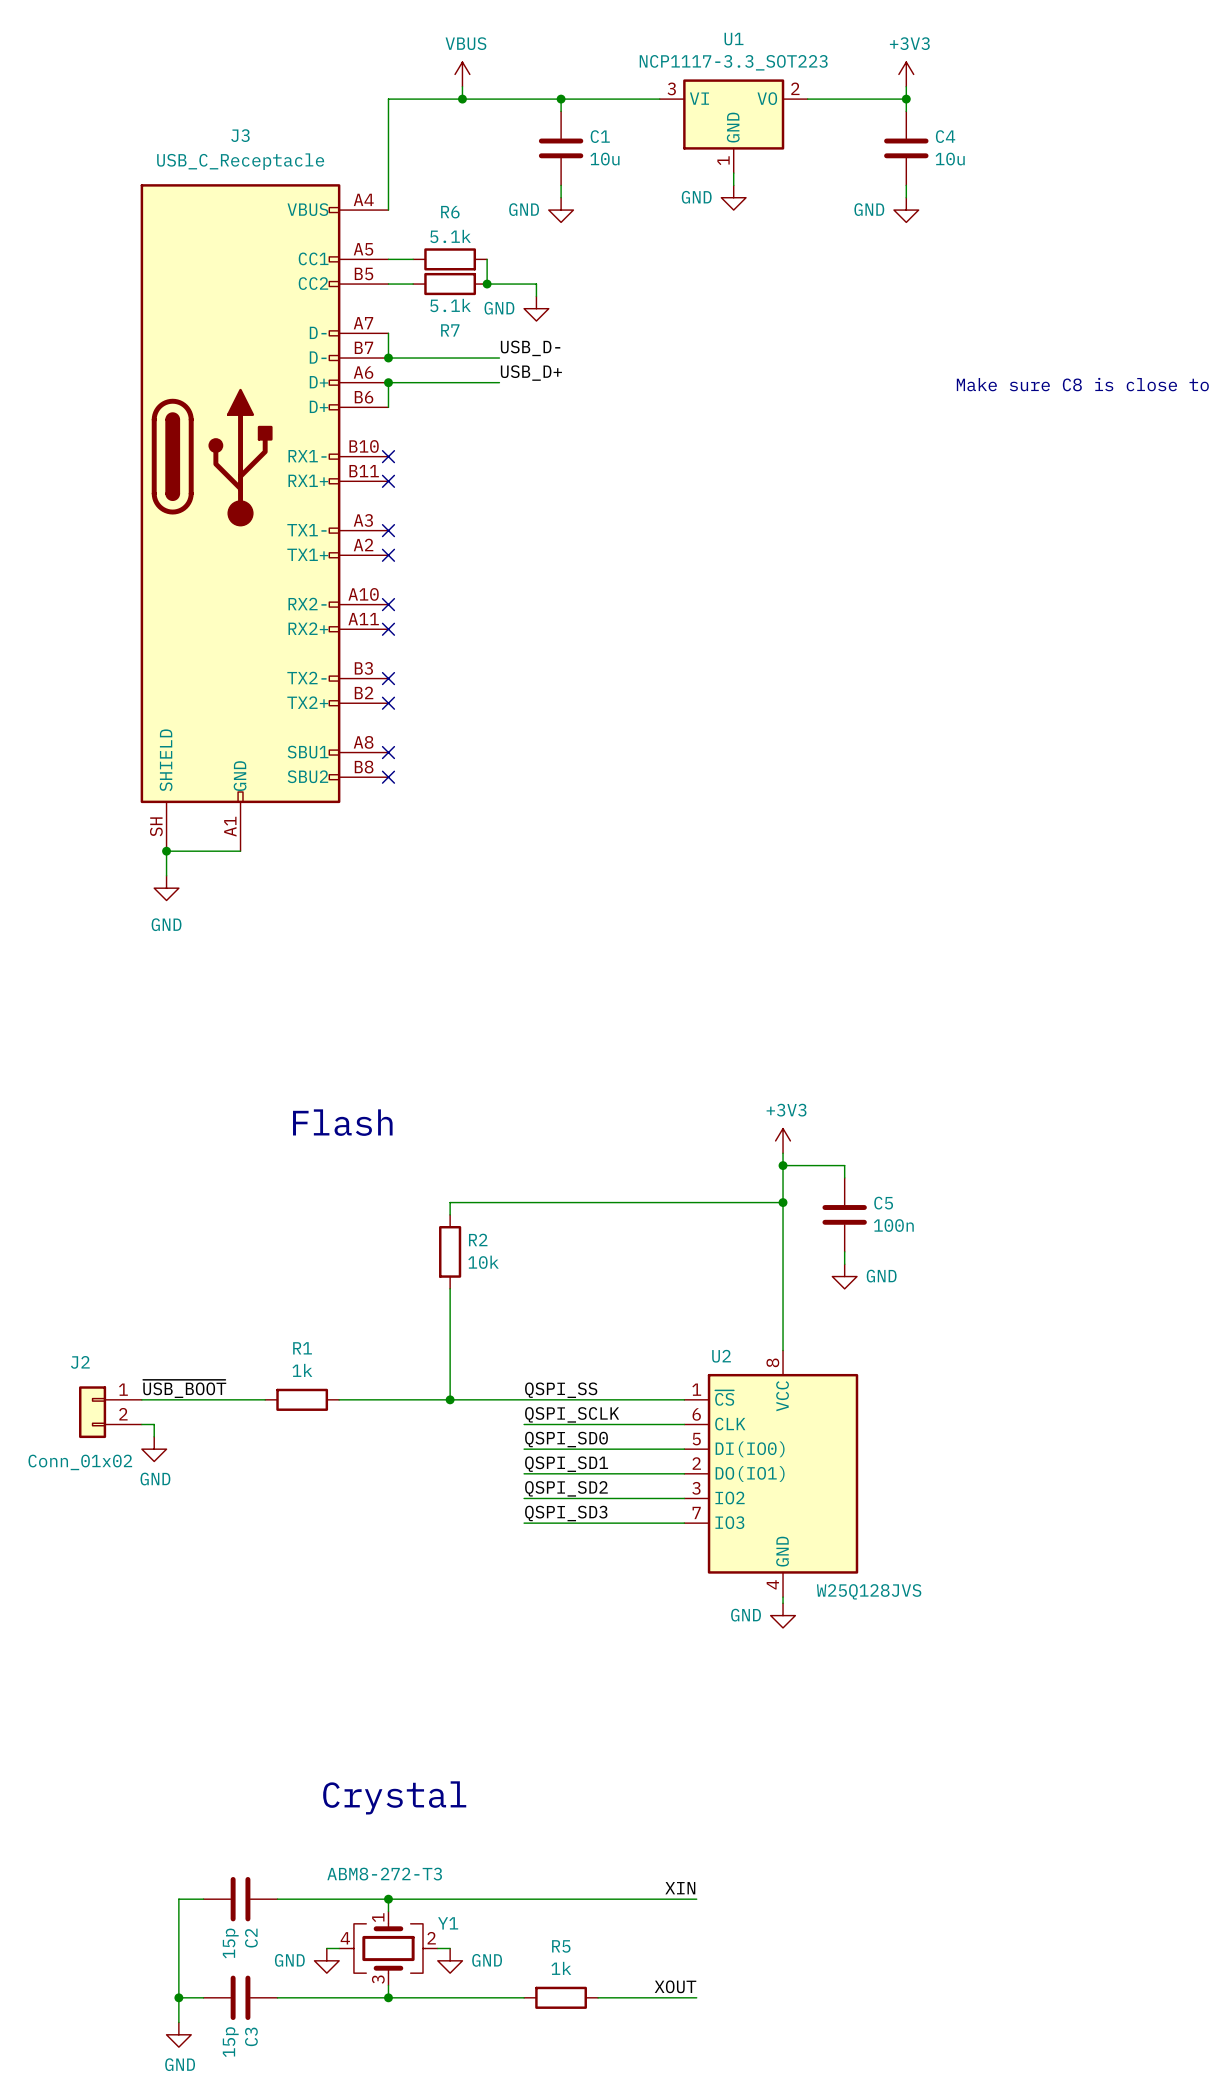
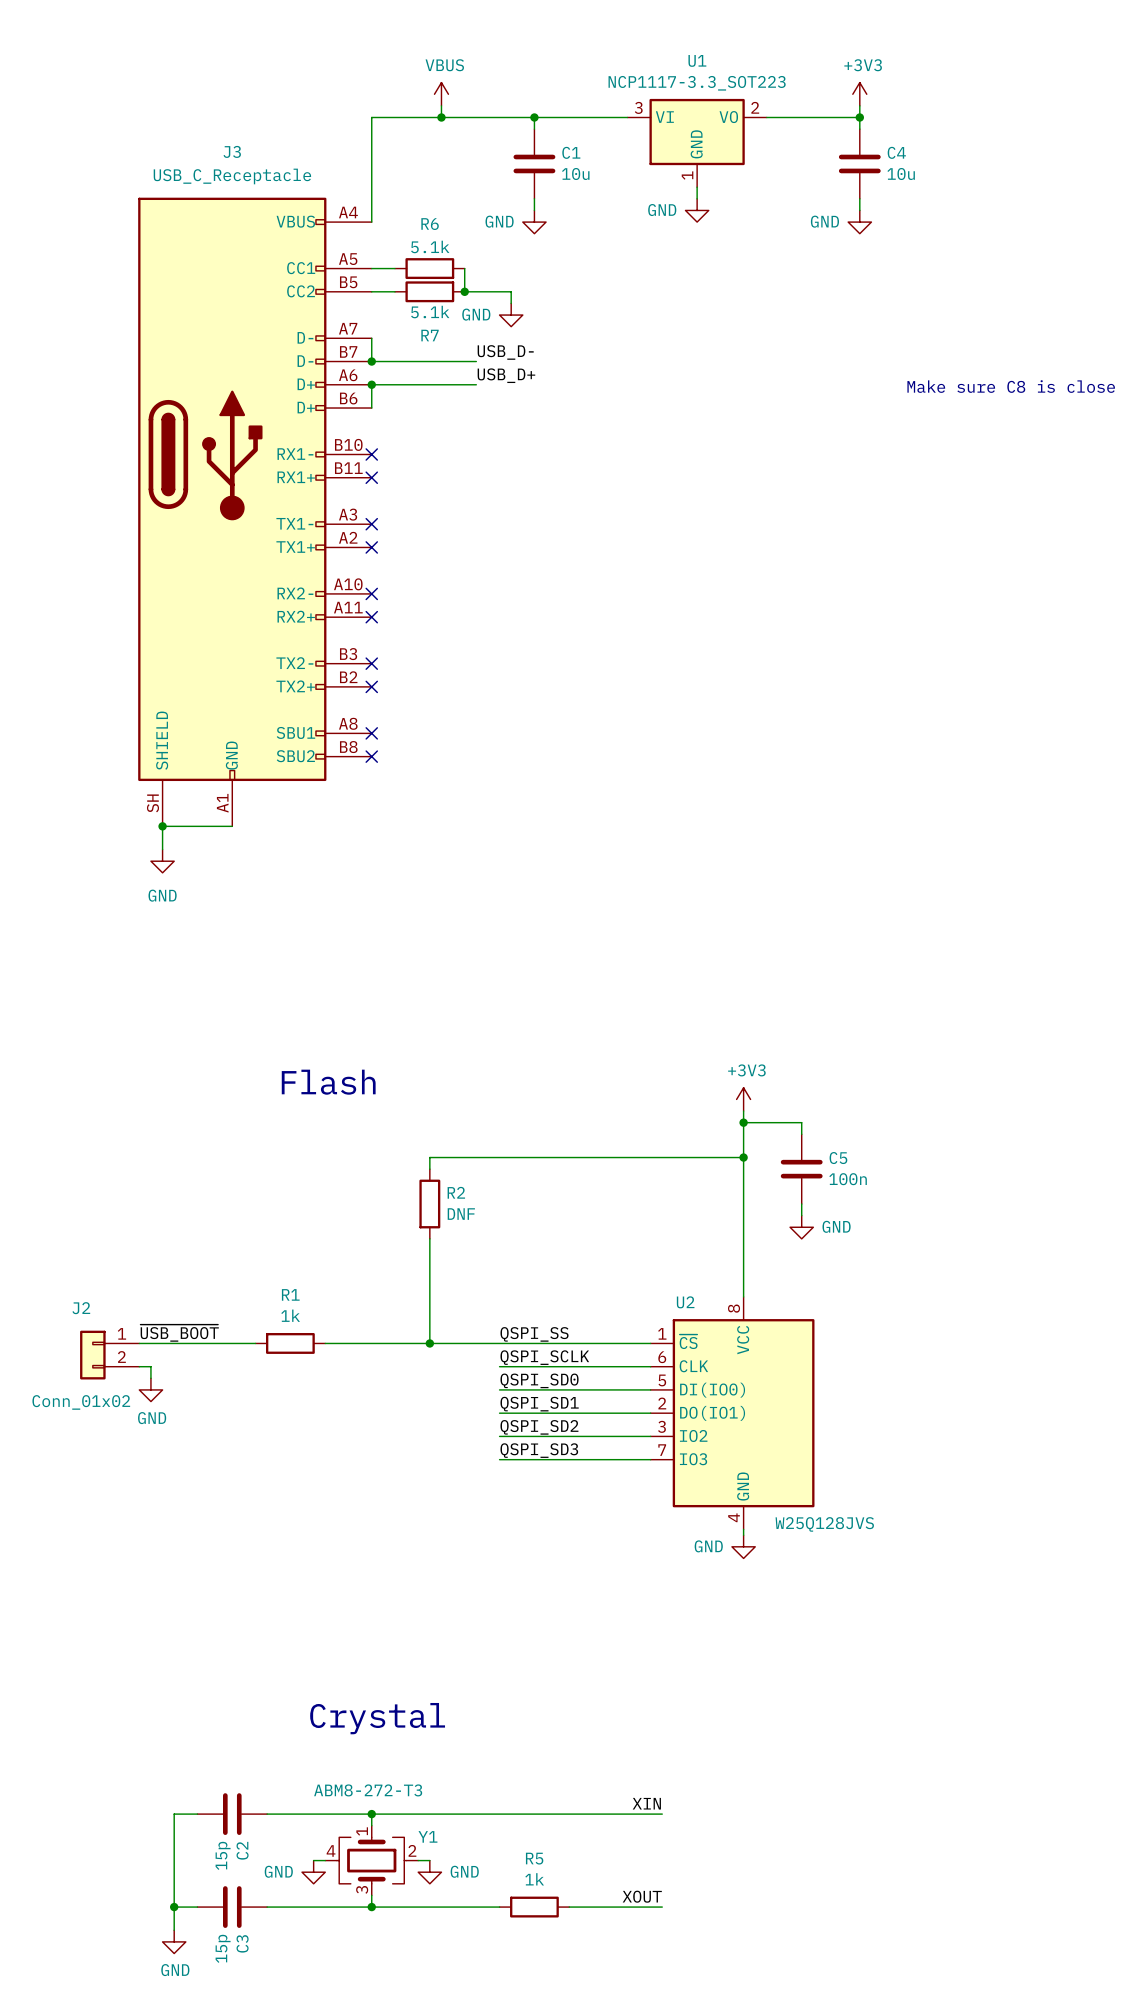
R2 value: 10k (483, 1262) -> DNF (461, 1214)

